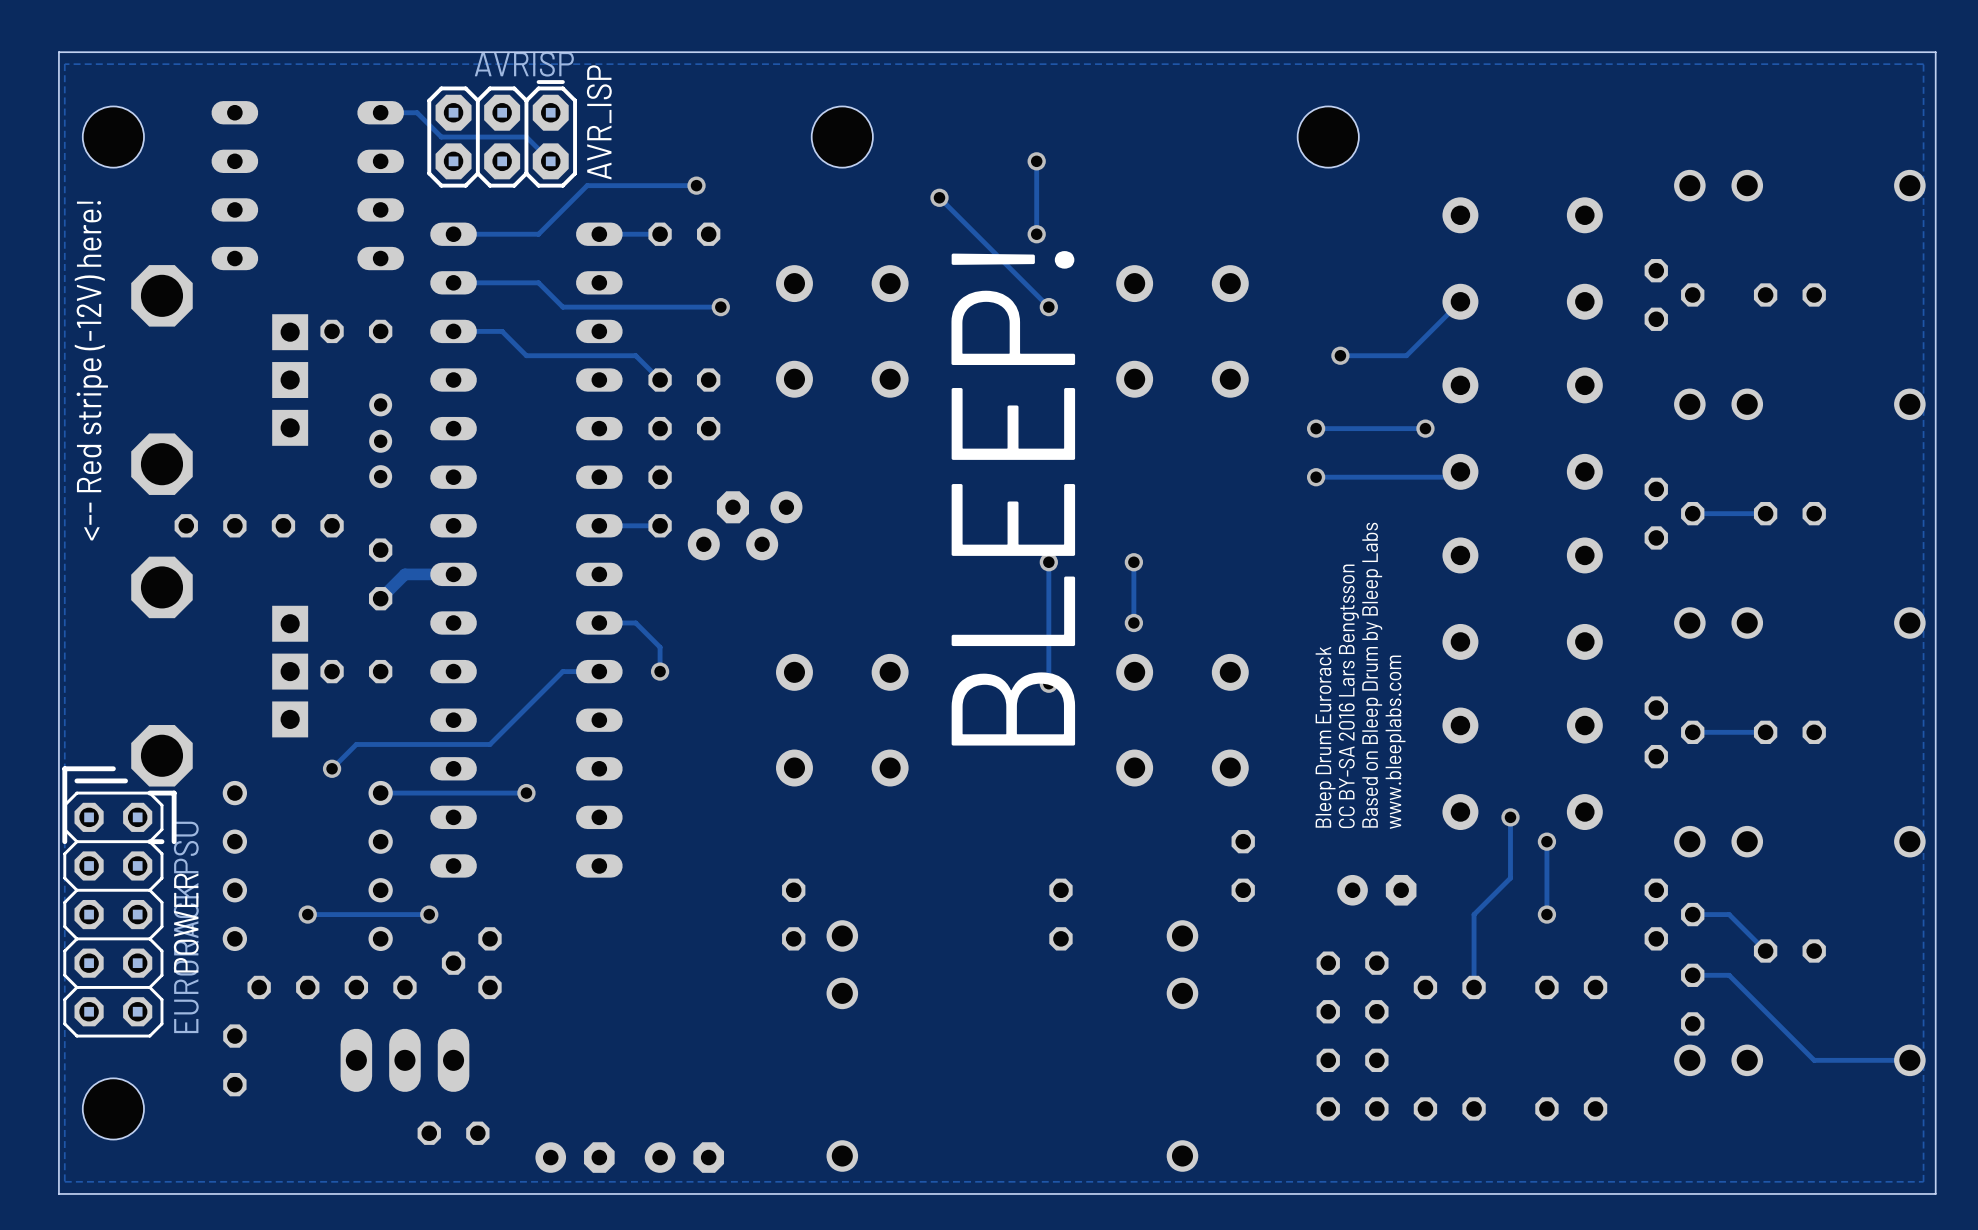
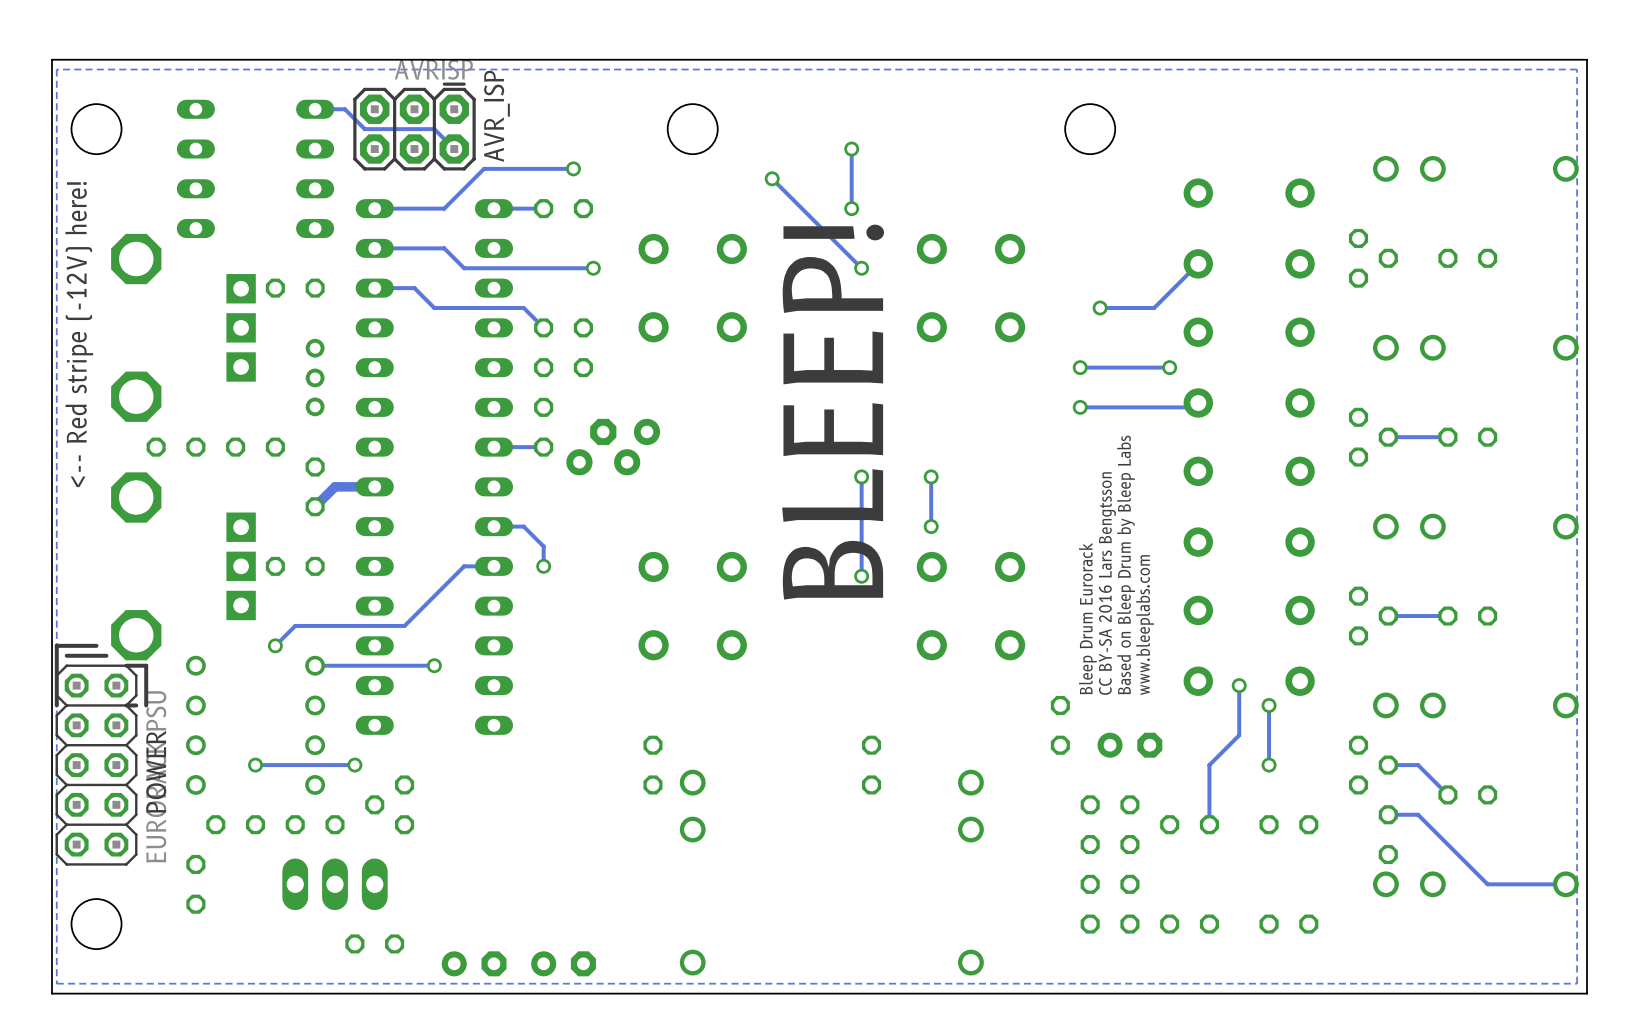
part position: (1243, 865) -> (1060, 725)

